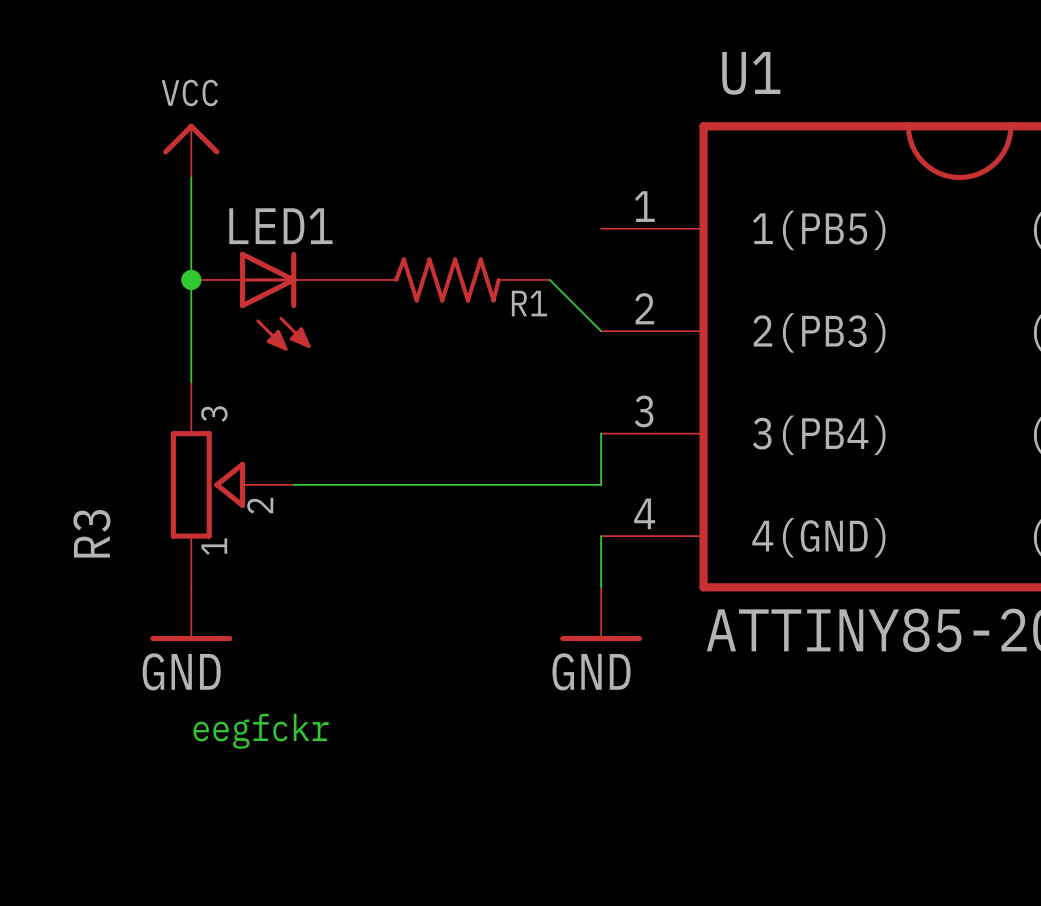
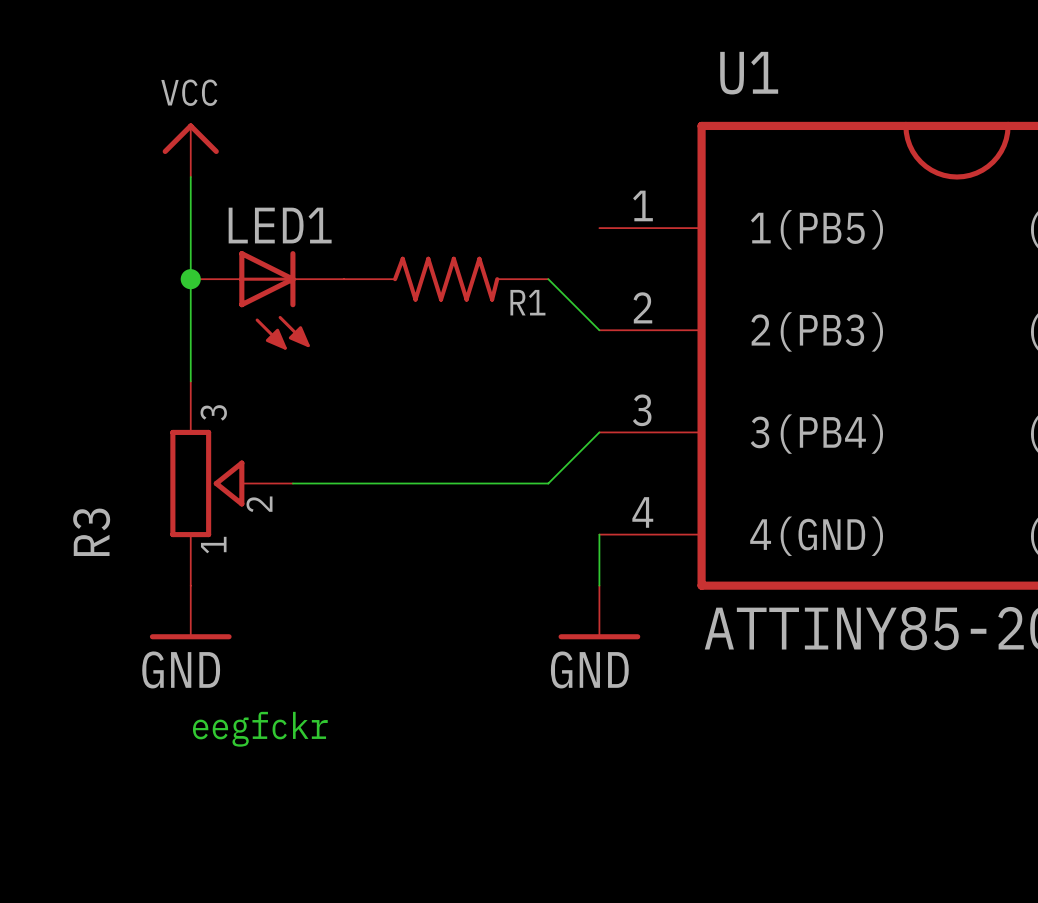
wire: (601, 433) (601, 484) (549, 484) -> (599, 432) (548, 483)

